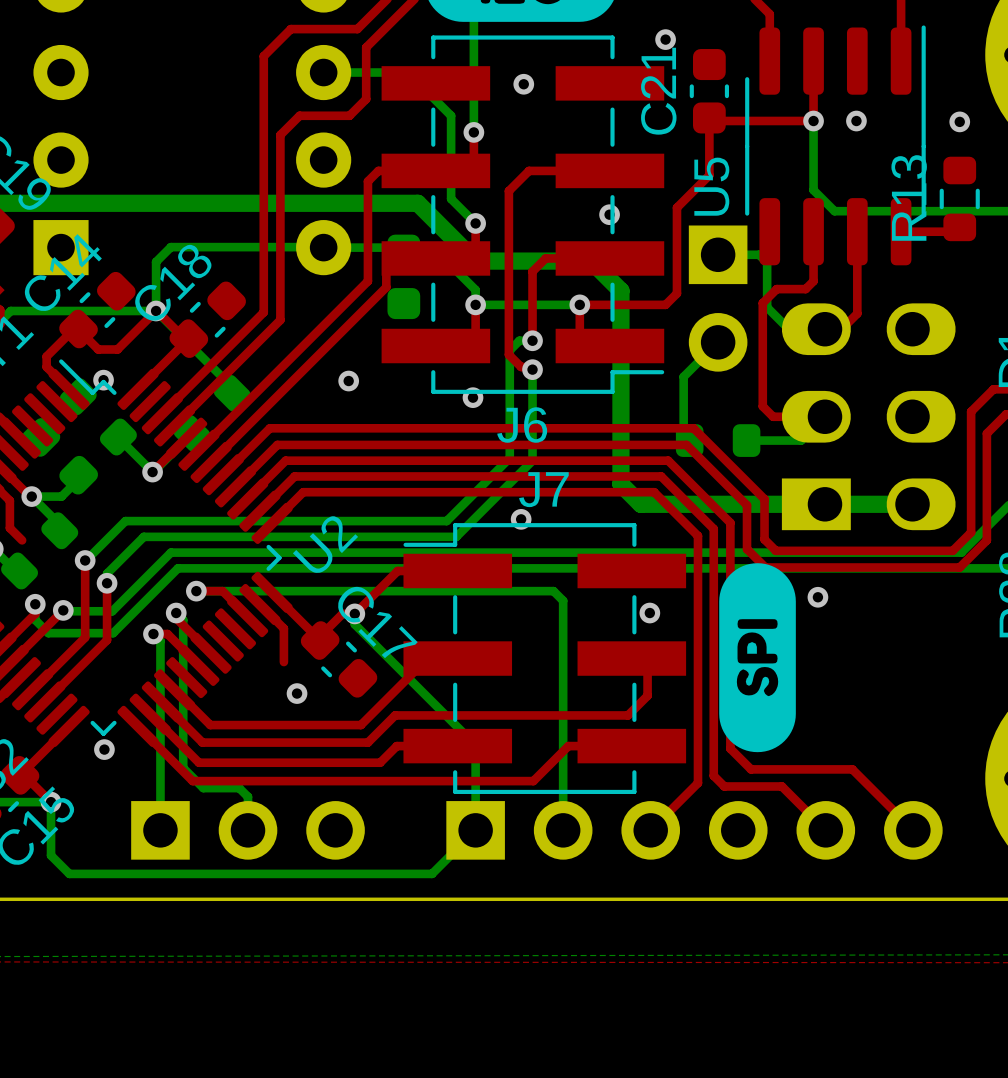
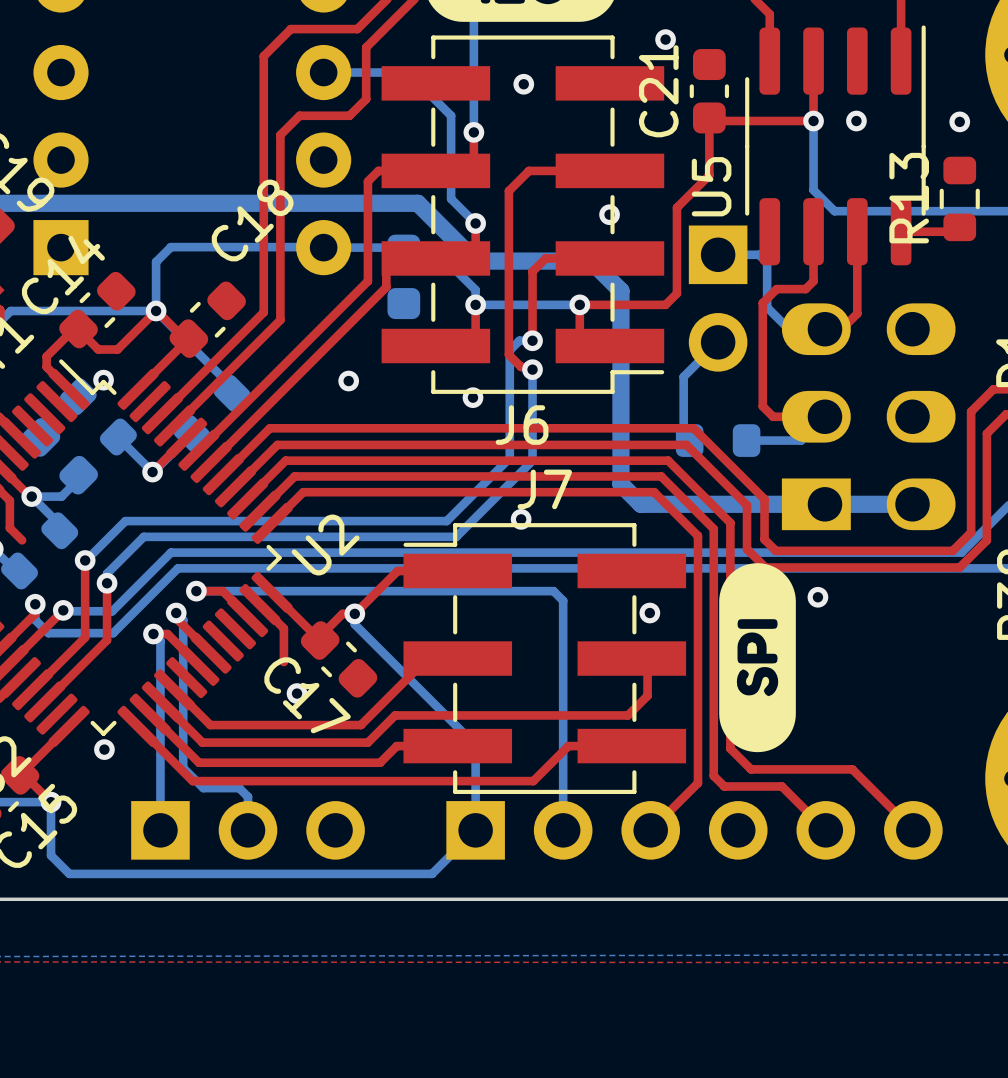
C18 name position: C18 (173, 282) -> C18 (252, 220)
C17 name position: C17 (377, 622) -> C17 (307, 695)

